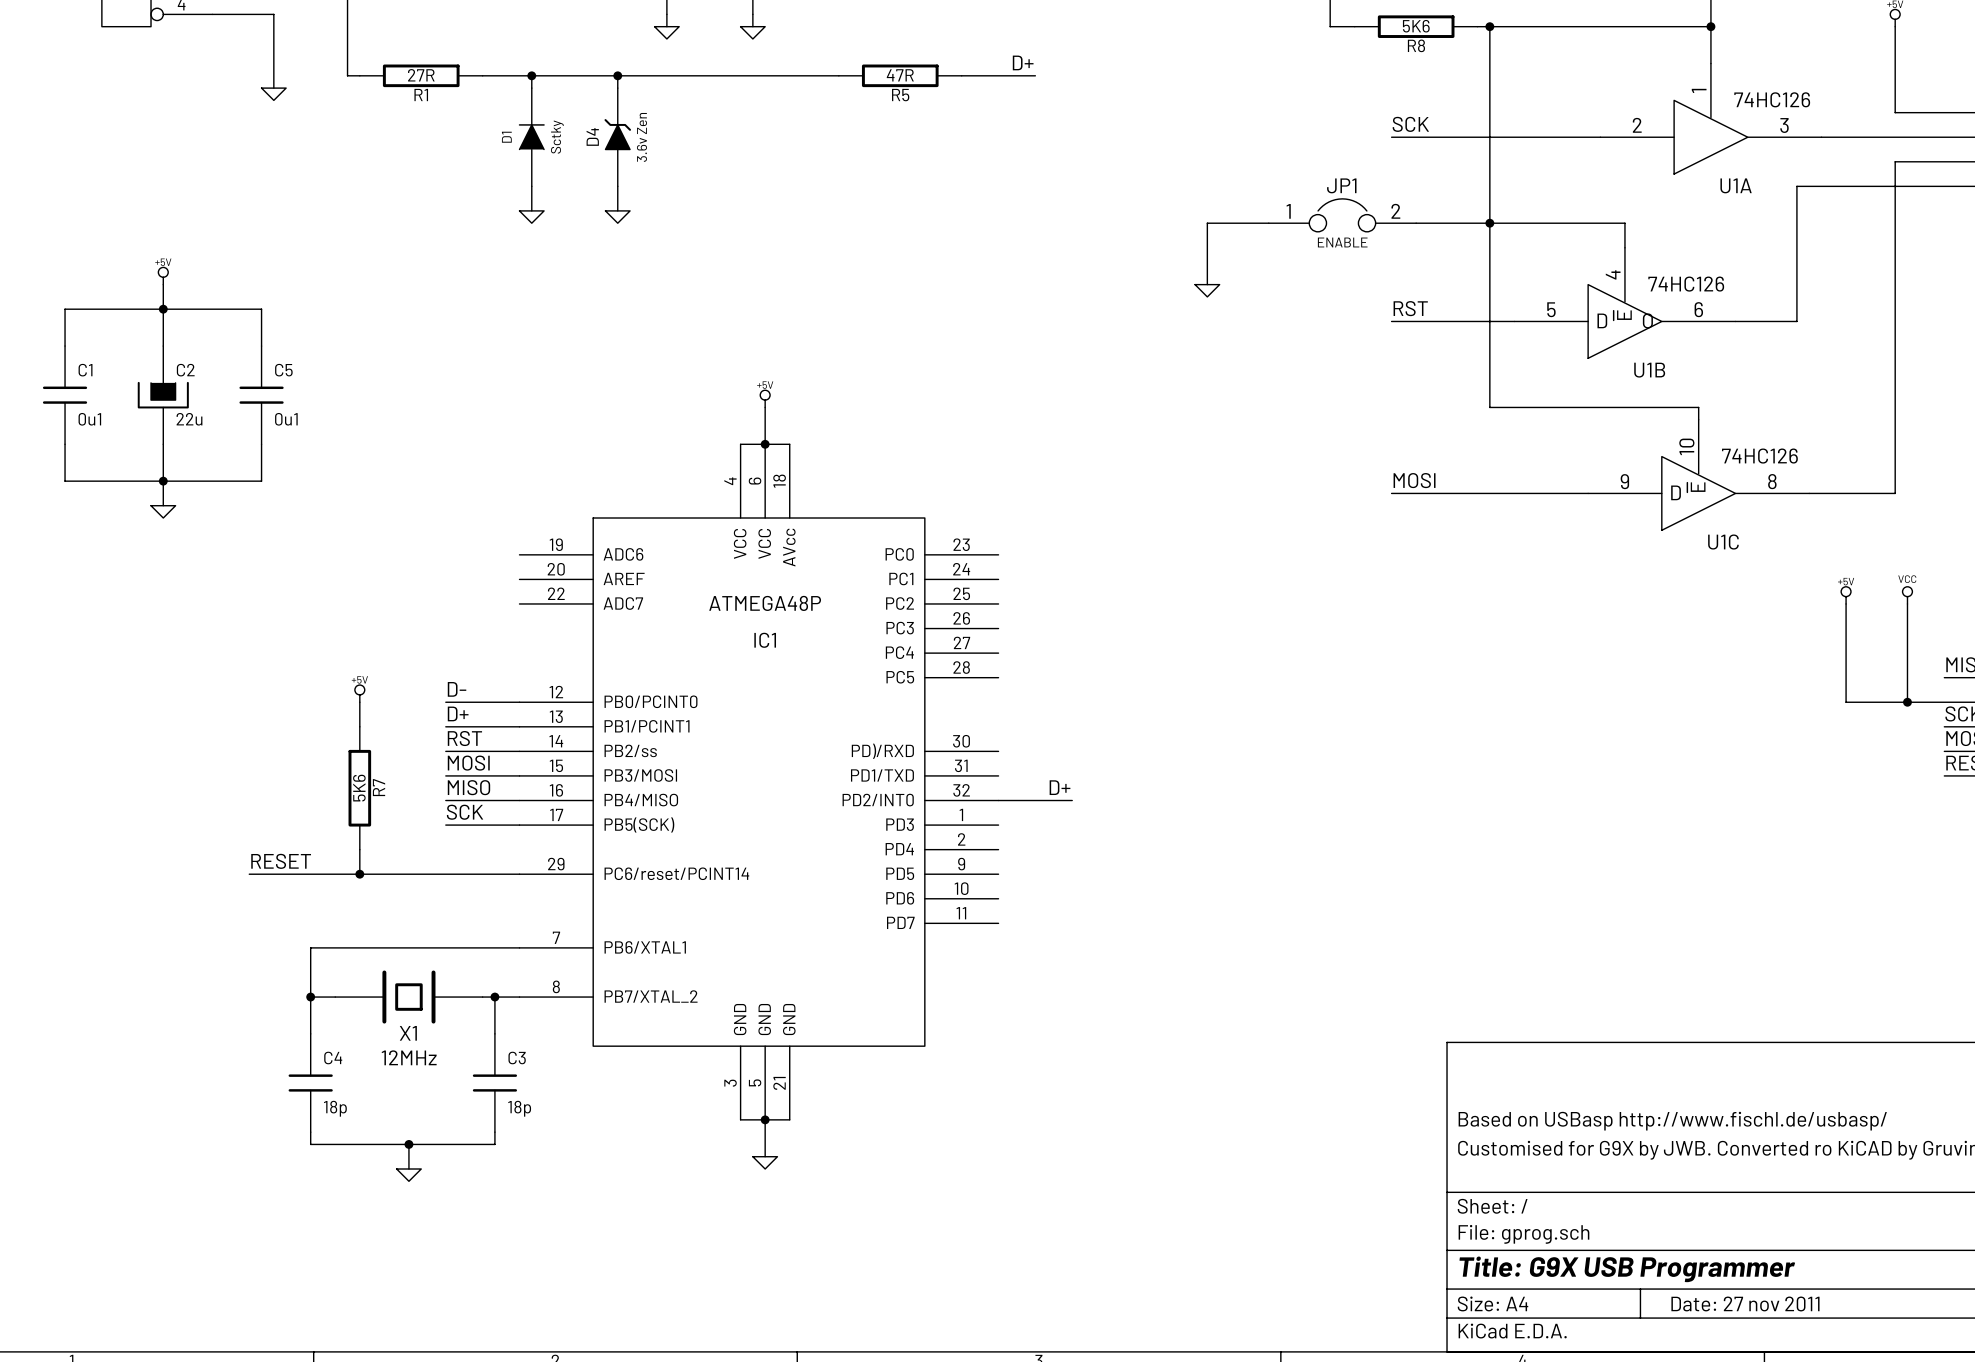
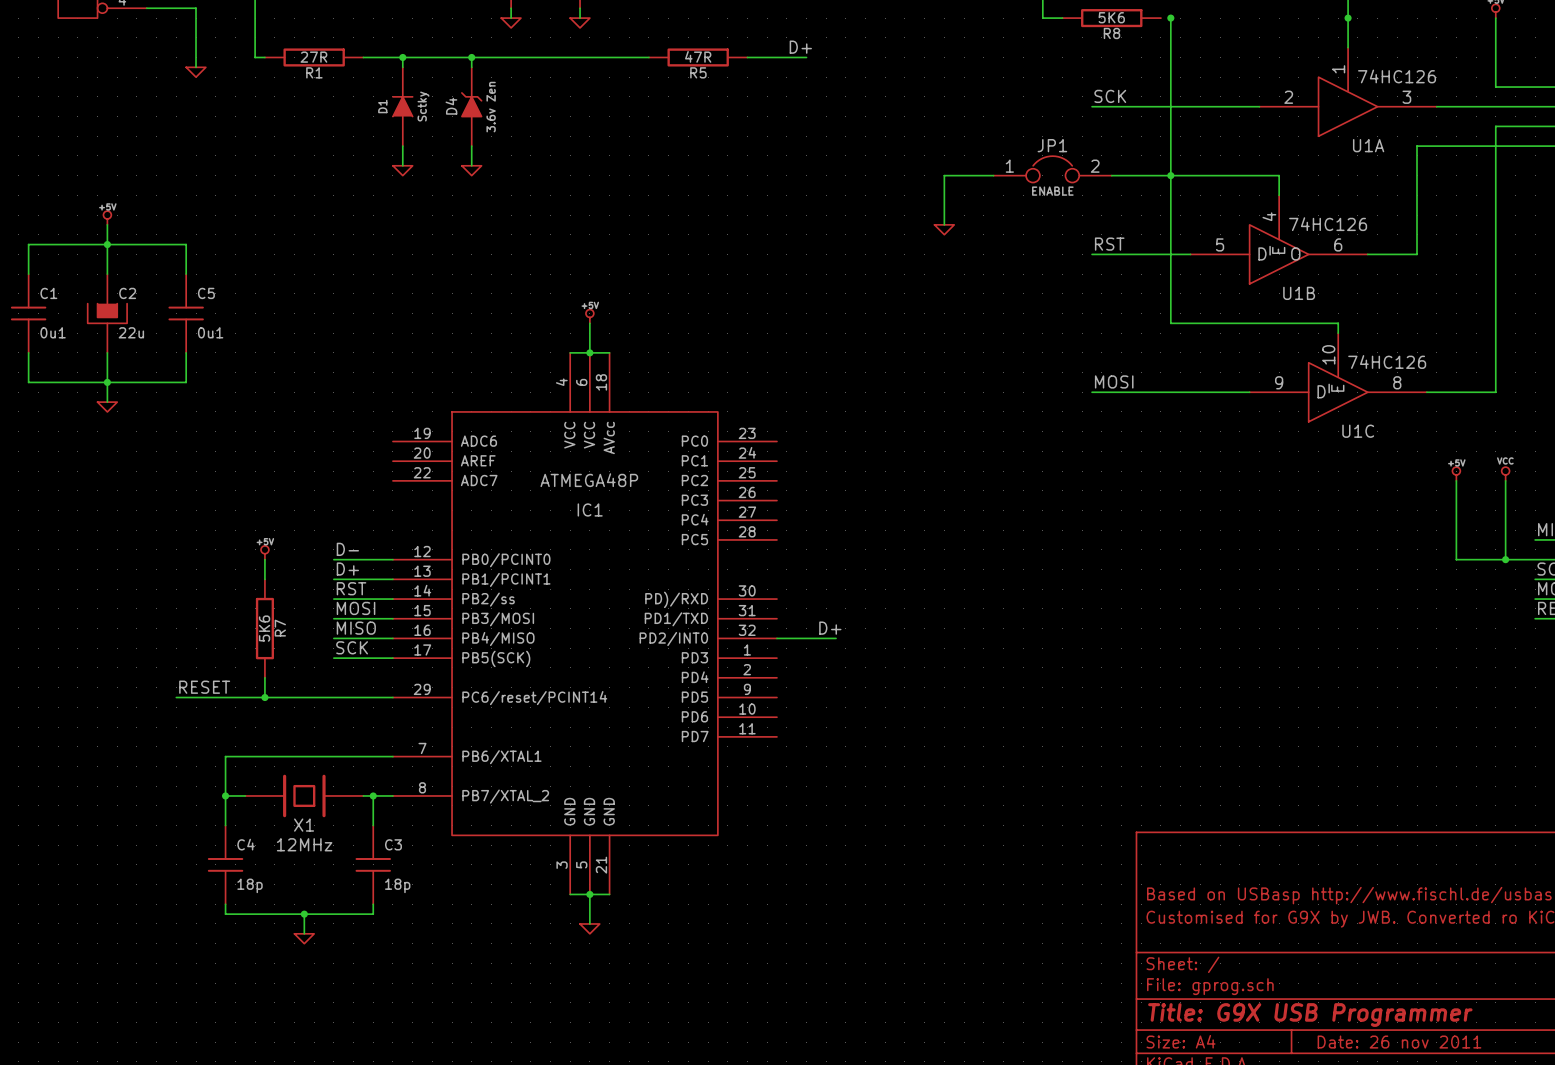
wire: (1477, 26) (1710, 26) -> none
title block: Date: 27 nov 2011 (1745, 1303) -> Date: 26 nov 2011 (1399, 1042)

